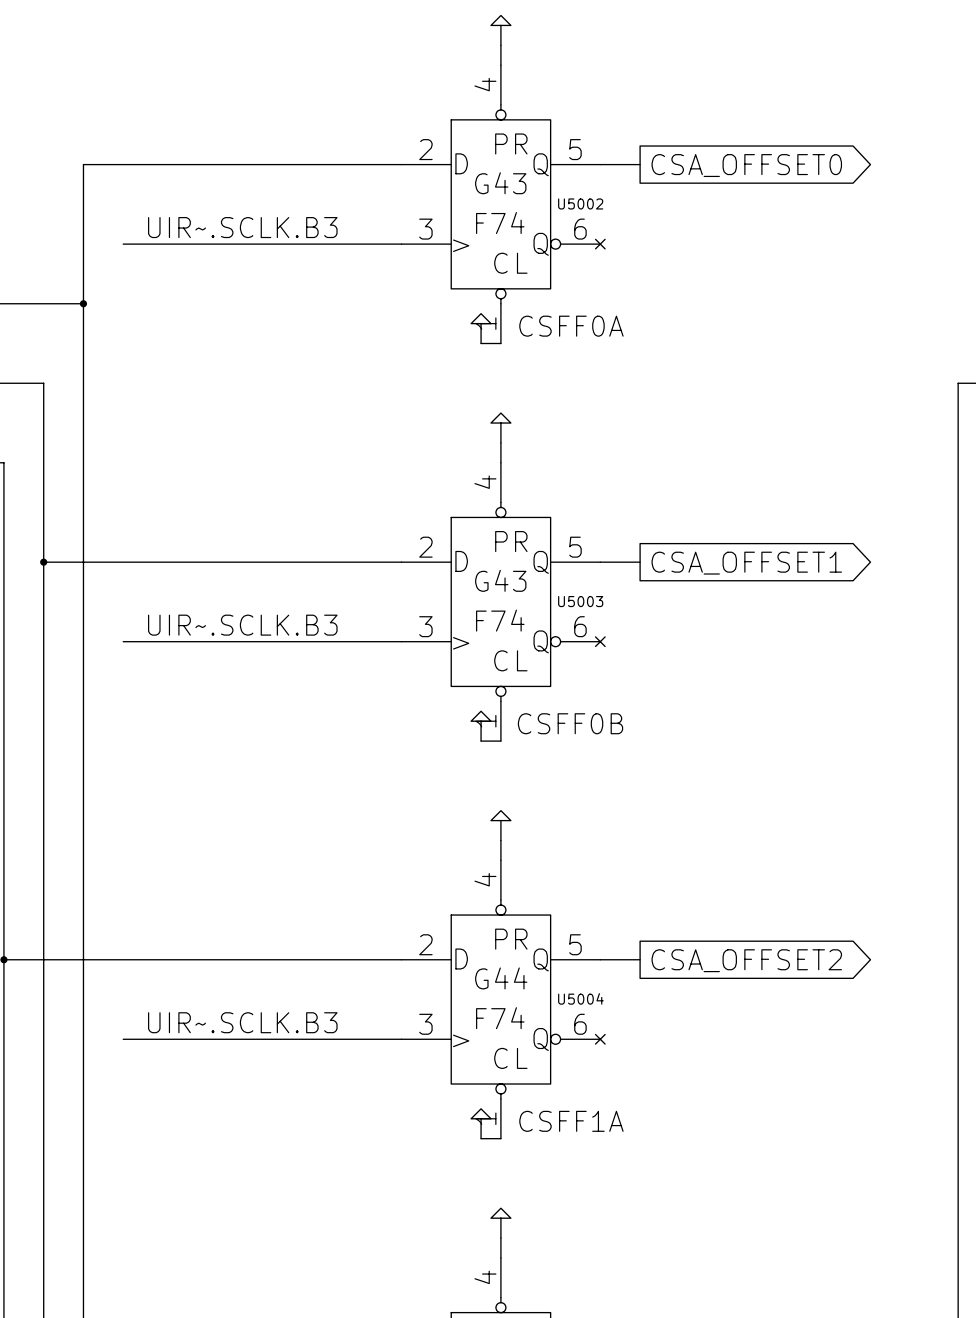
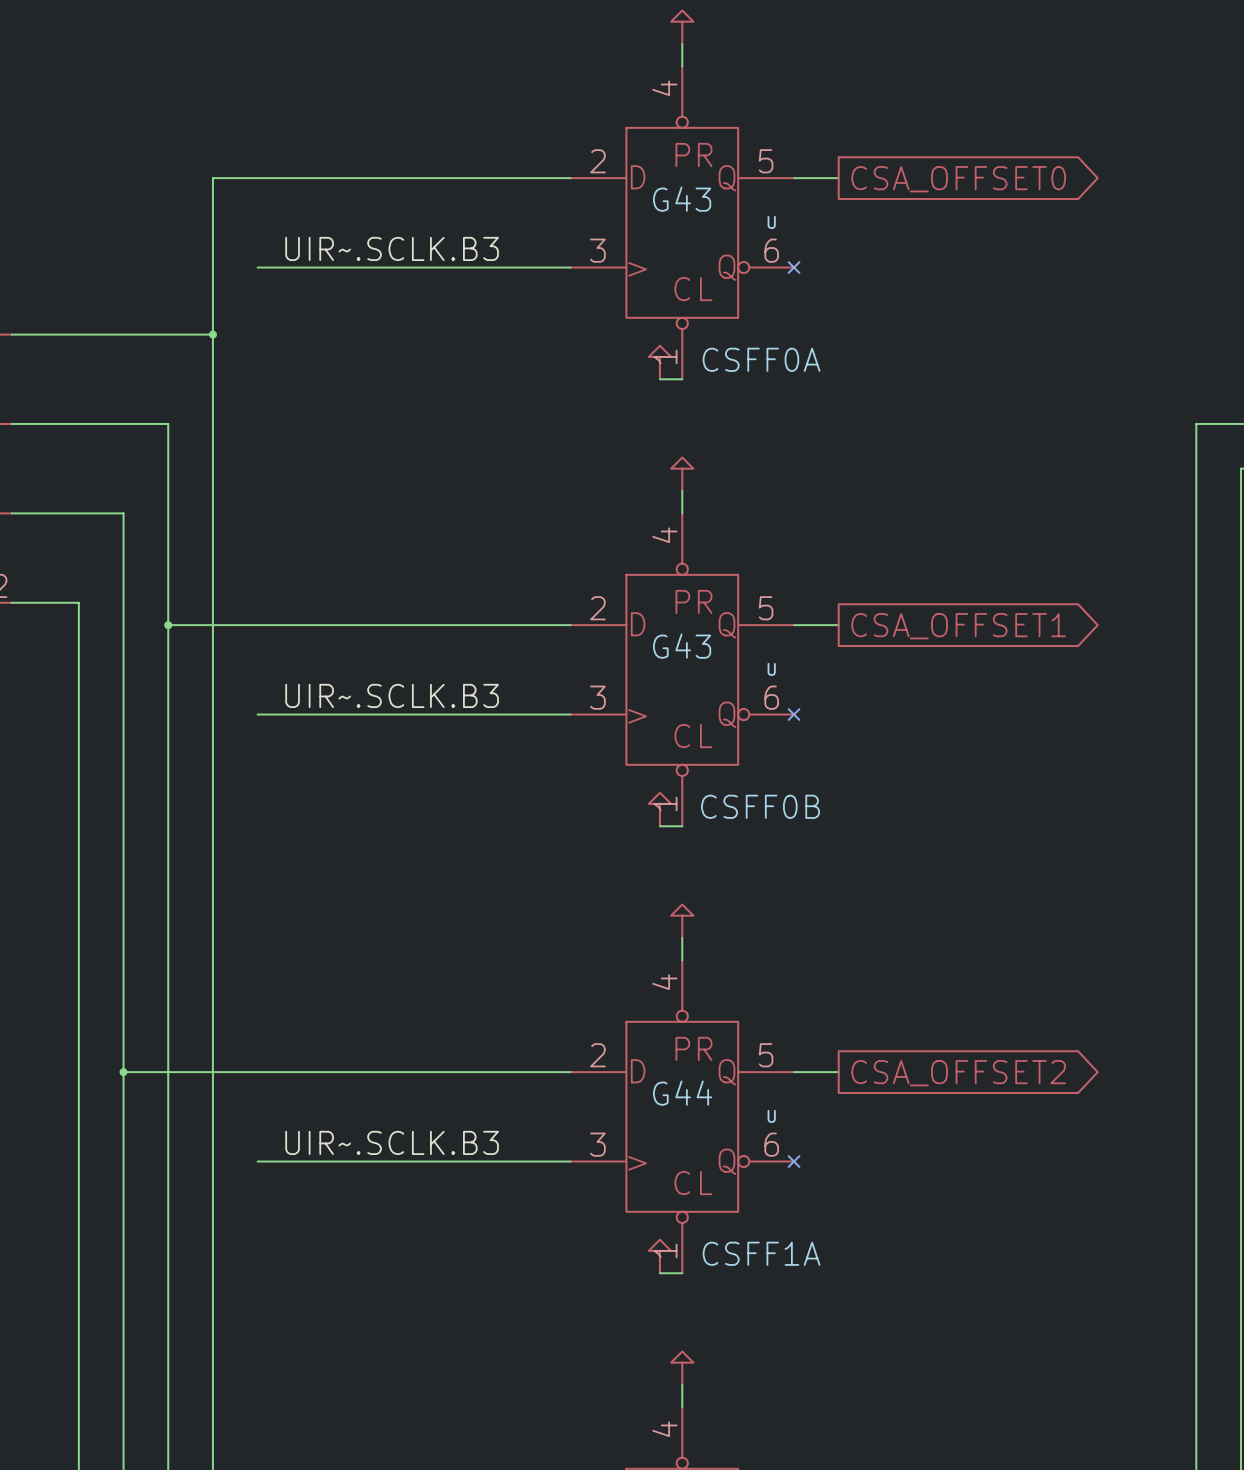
U5002 name: U5002 (580, 203) -> U (771, 222)
U5002 value: F74 (500, 223) -> none
U5003 name: U5003 (580, 601) -> U (771, 669)
U5003 value: F74 (500, 620) -> none
U5004 name: U5004 (580, 998) -> U (771, 1116)
U5004 value: F74 (500, 1018) -> none

